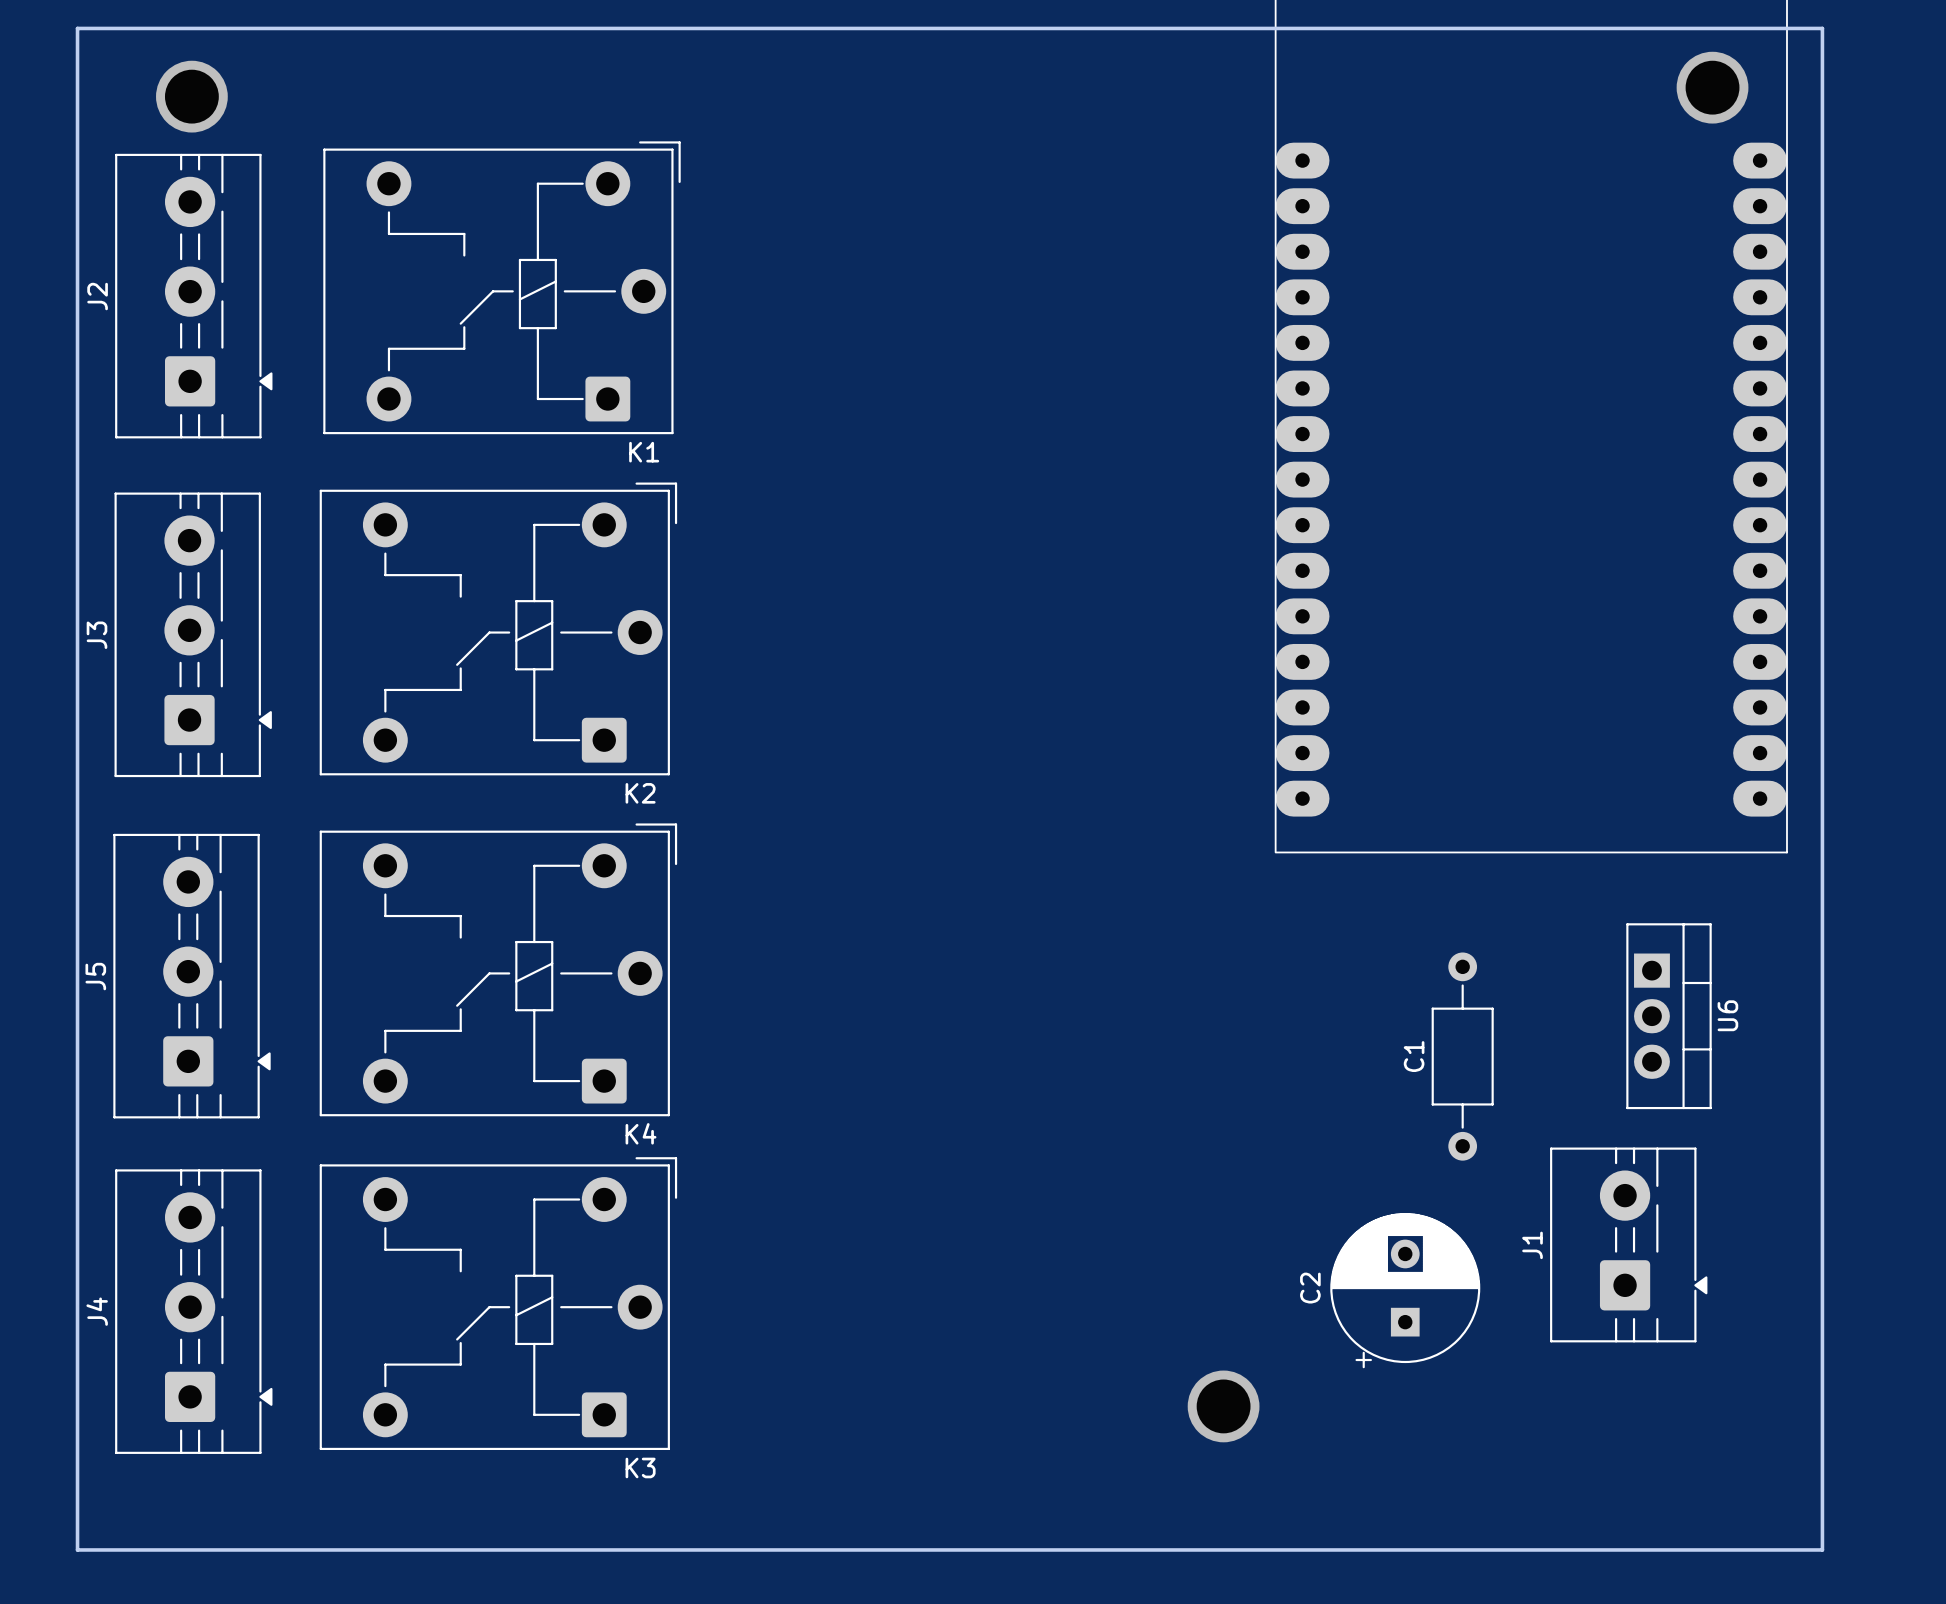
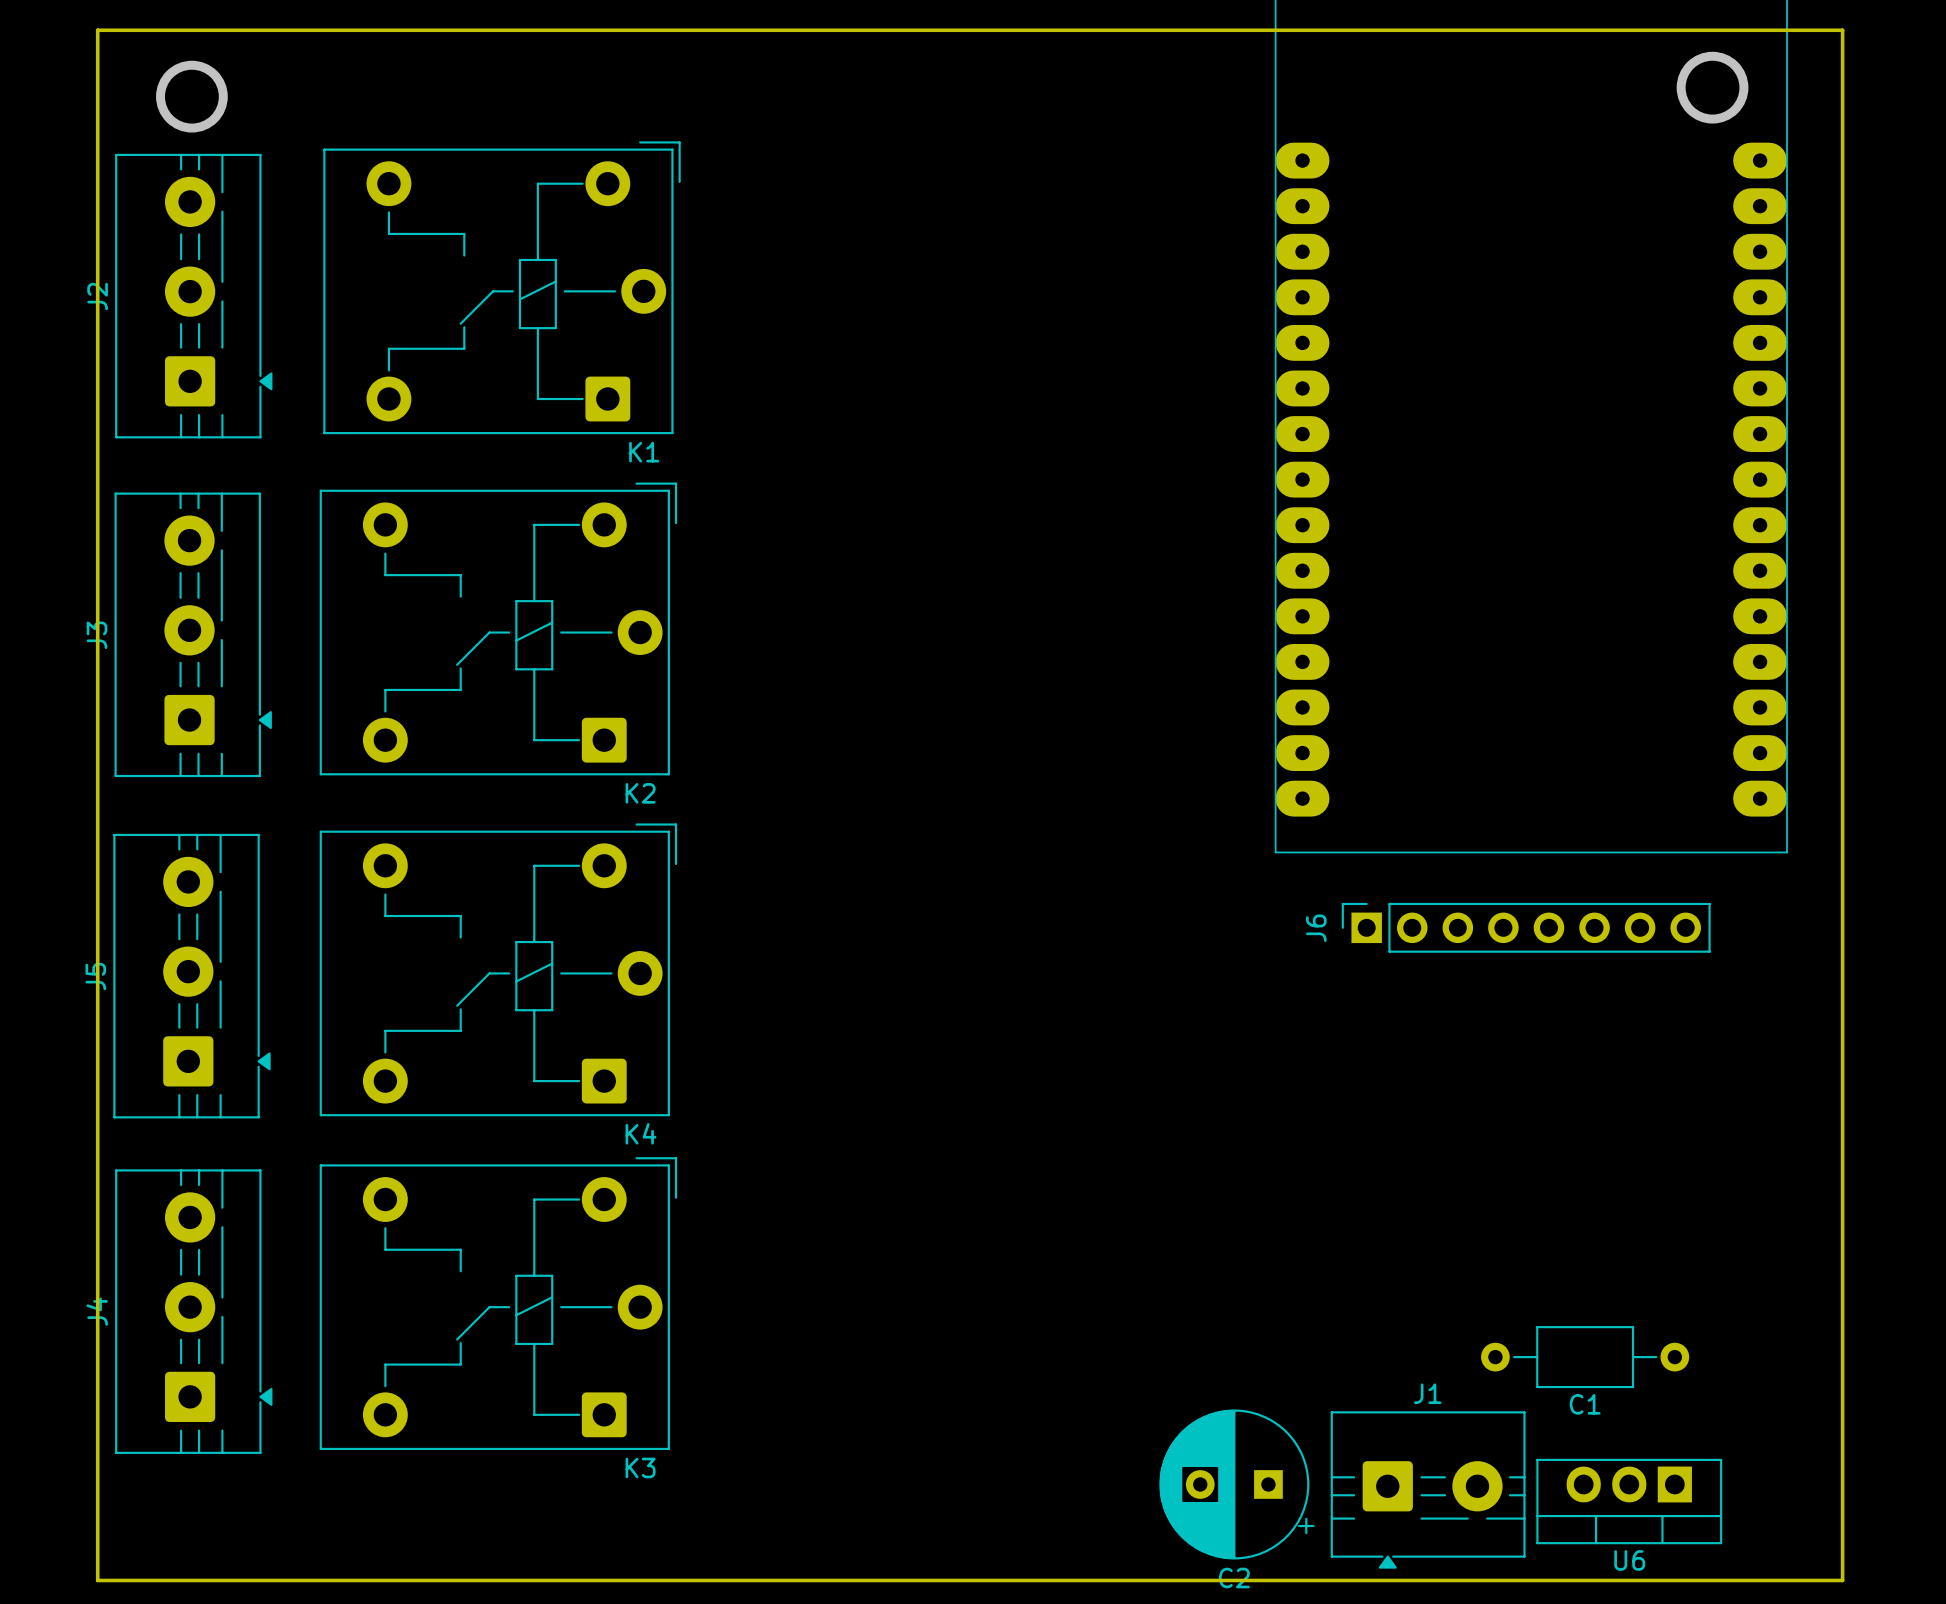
board edge: (77, 28) (1822, 28) (1822, 1549) (77, 1549) (77, 28) -> (97, 30) (97, 1580) (1842, 1580) (1842, 30) (97, 30)
J6: none -> (1526, 927)
U6 rotation: 0° (1669, 1016) -> 90° clockwise (1629, 1501)
U6 position: (1669, 1016) -> (1629, 1501)
C1 name position: C1 (1414, 1056) -> C1 (1585, 1404)
C1 rotation: 0° (1462, 1056) -> 90° clockwise (1585, 1357)
C1 position: (1462, 1056) -> (1585, 1357)
J1 rotation: 0° (1628, 1244) -> 90° clockwise (1428, 1489)
J1 position: (1628, 1244) -> (1428, 1489)
C2 rotation: 0° (1405, 1290) -> 90° counterclockwise (1236, 1484)
C2 position: (1405, 1290) -> (1236, 1484)
via: (1223, 1406) -> none

